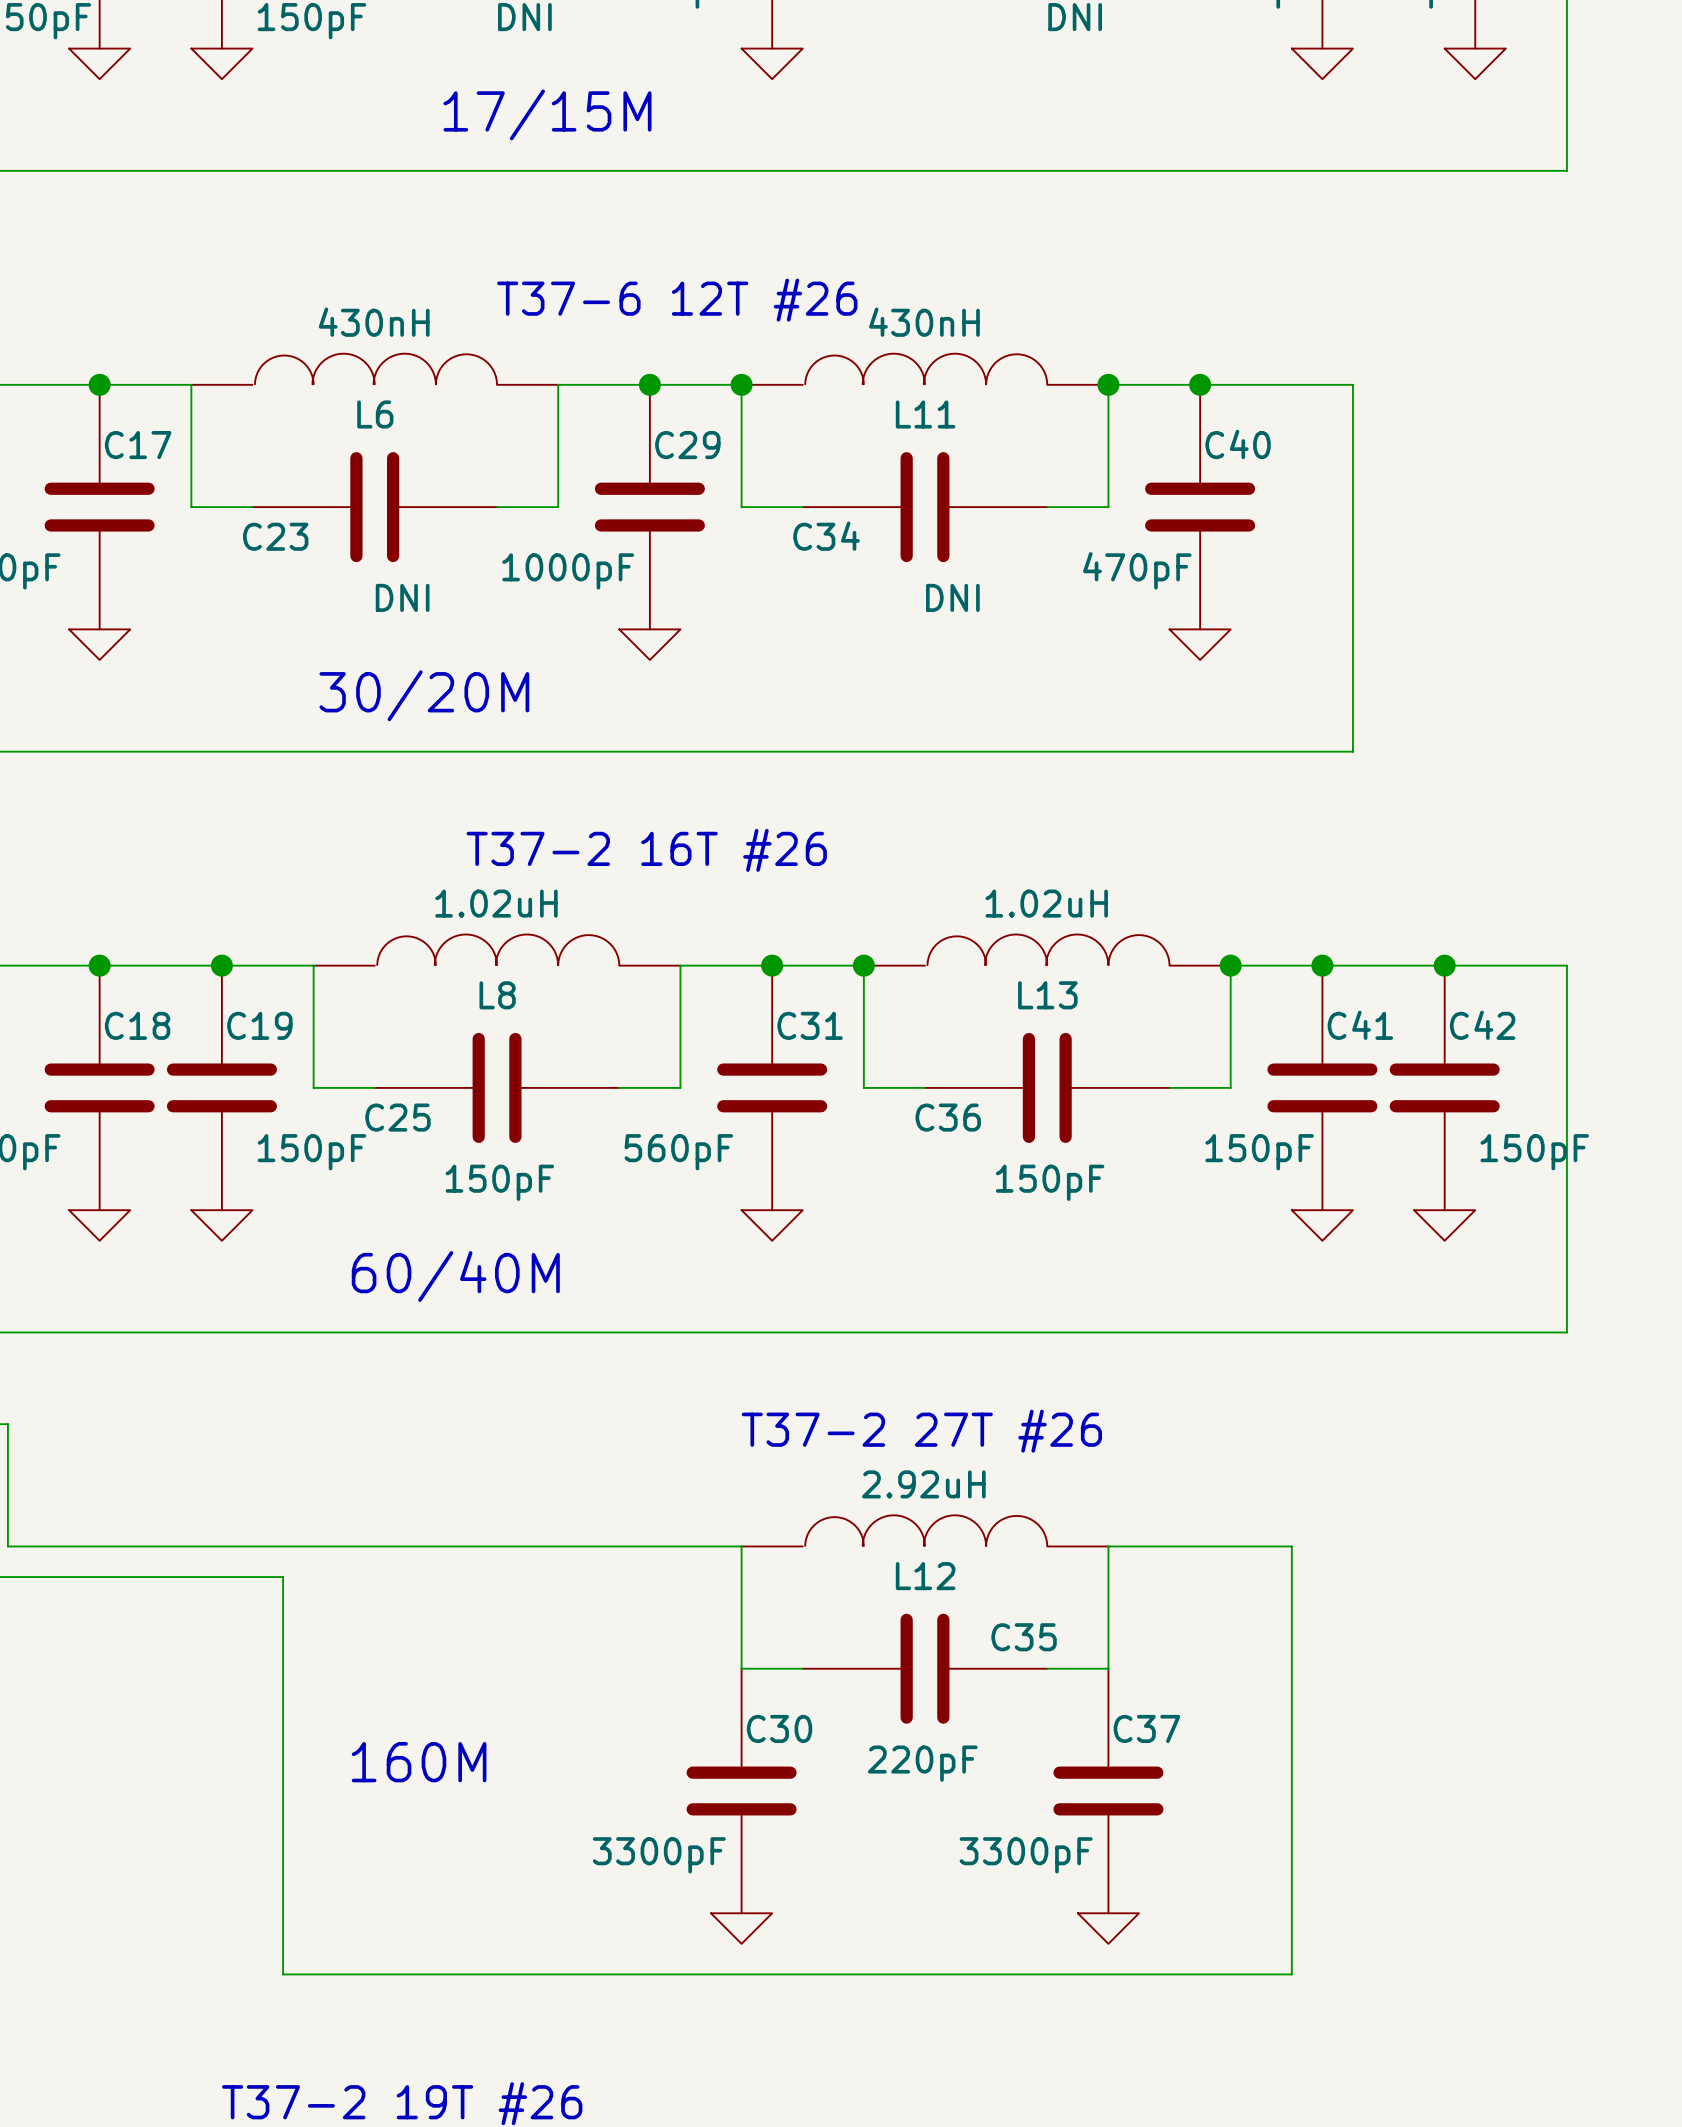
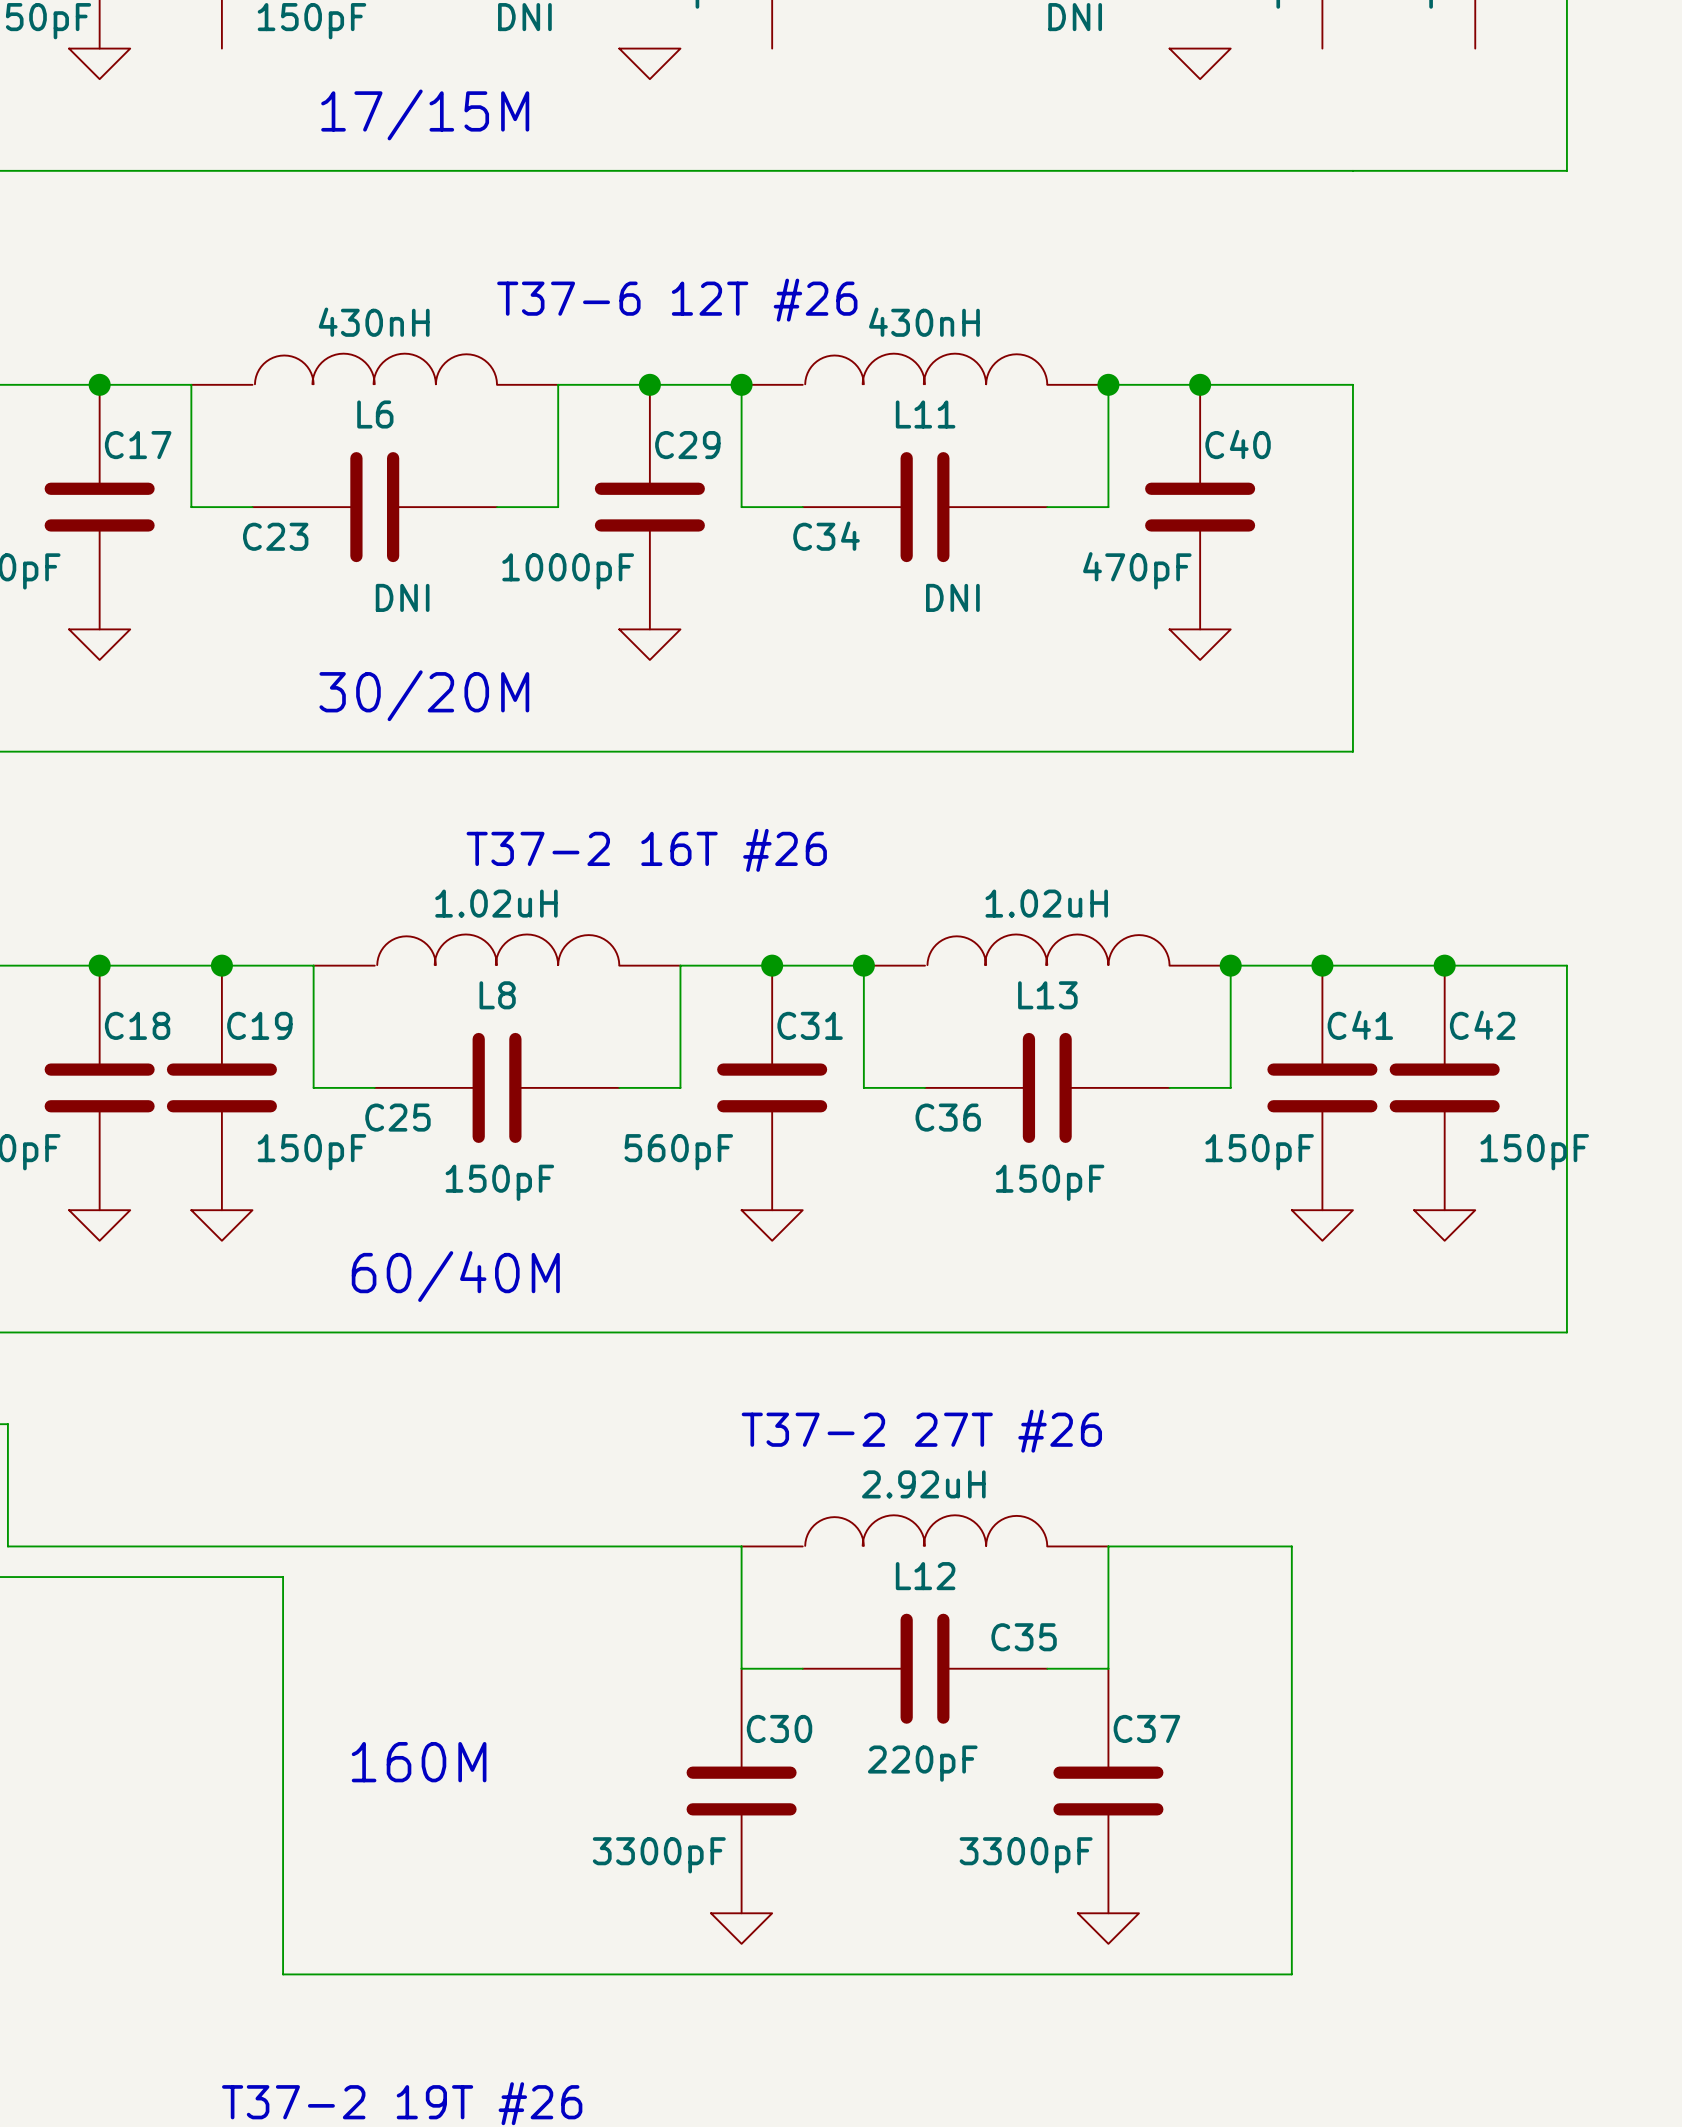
power symbol: (221, 63) -> none
power symbol position: (772, 63) -> (649, 63)
power symbol position: (1322, 63) -> (1200, 63)
power symbol: (1475, 63) -> none
text position: 17/15M (547, 114) -> 17/15M (425, 114)

